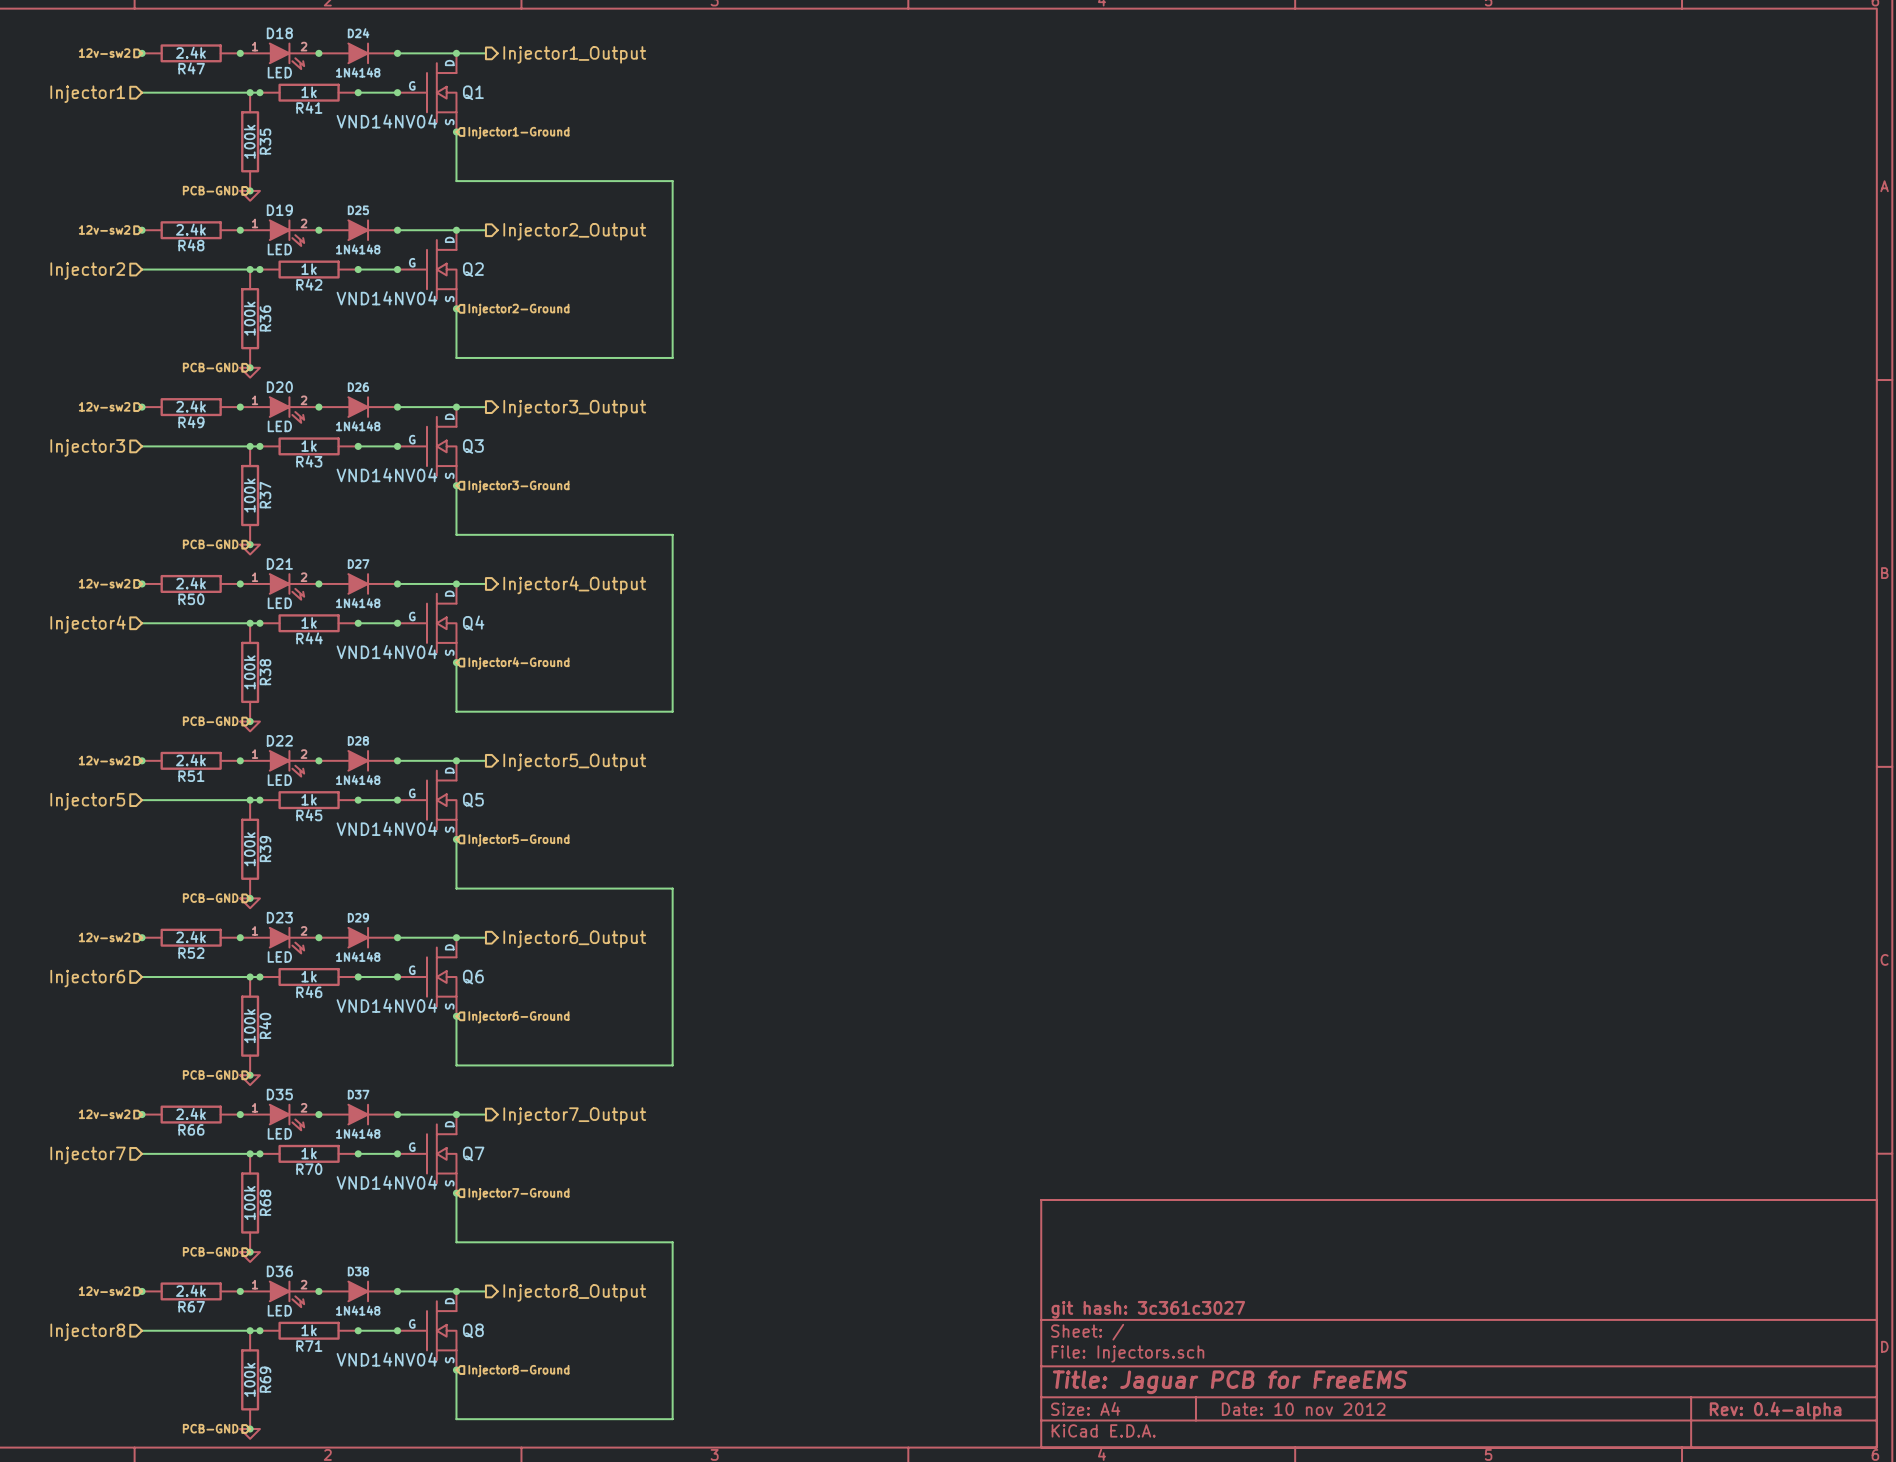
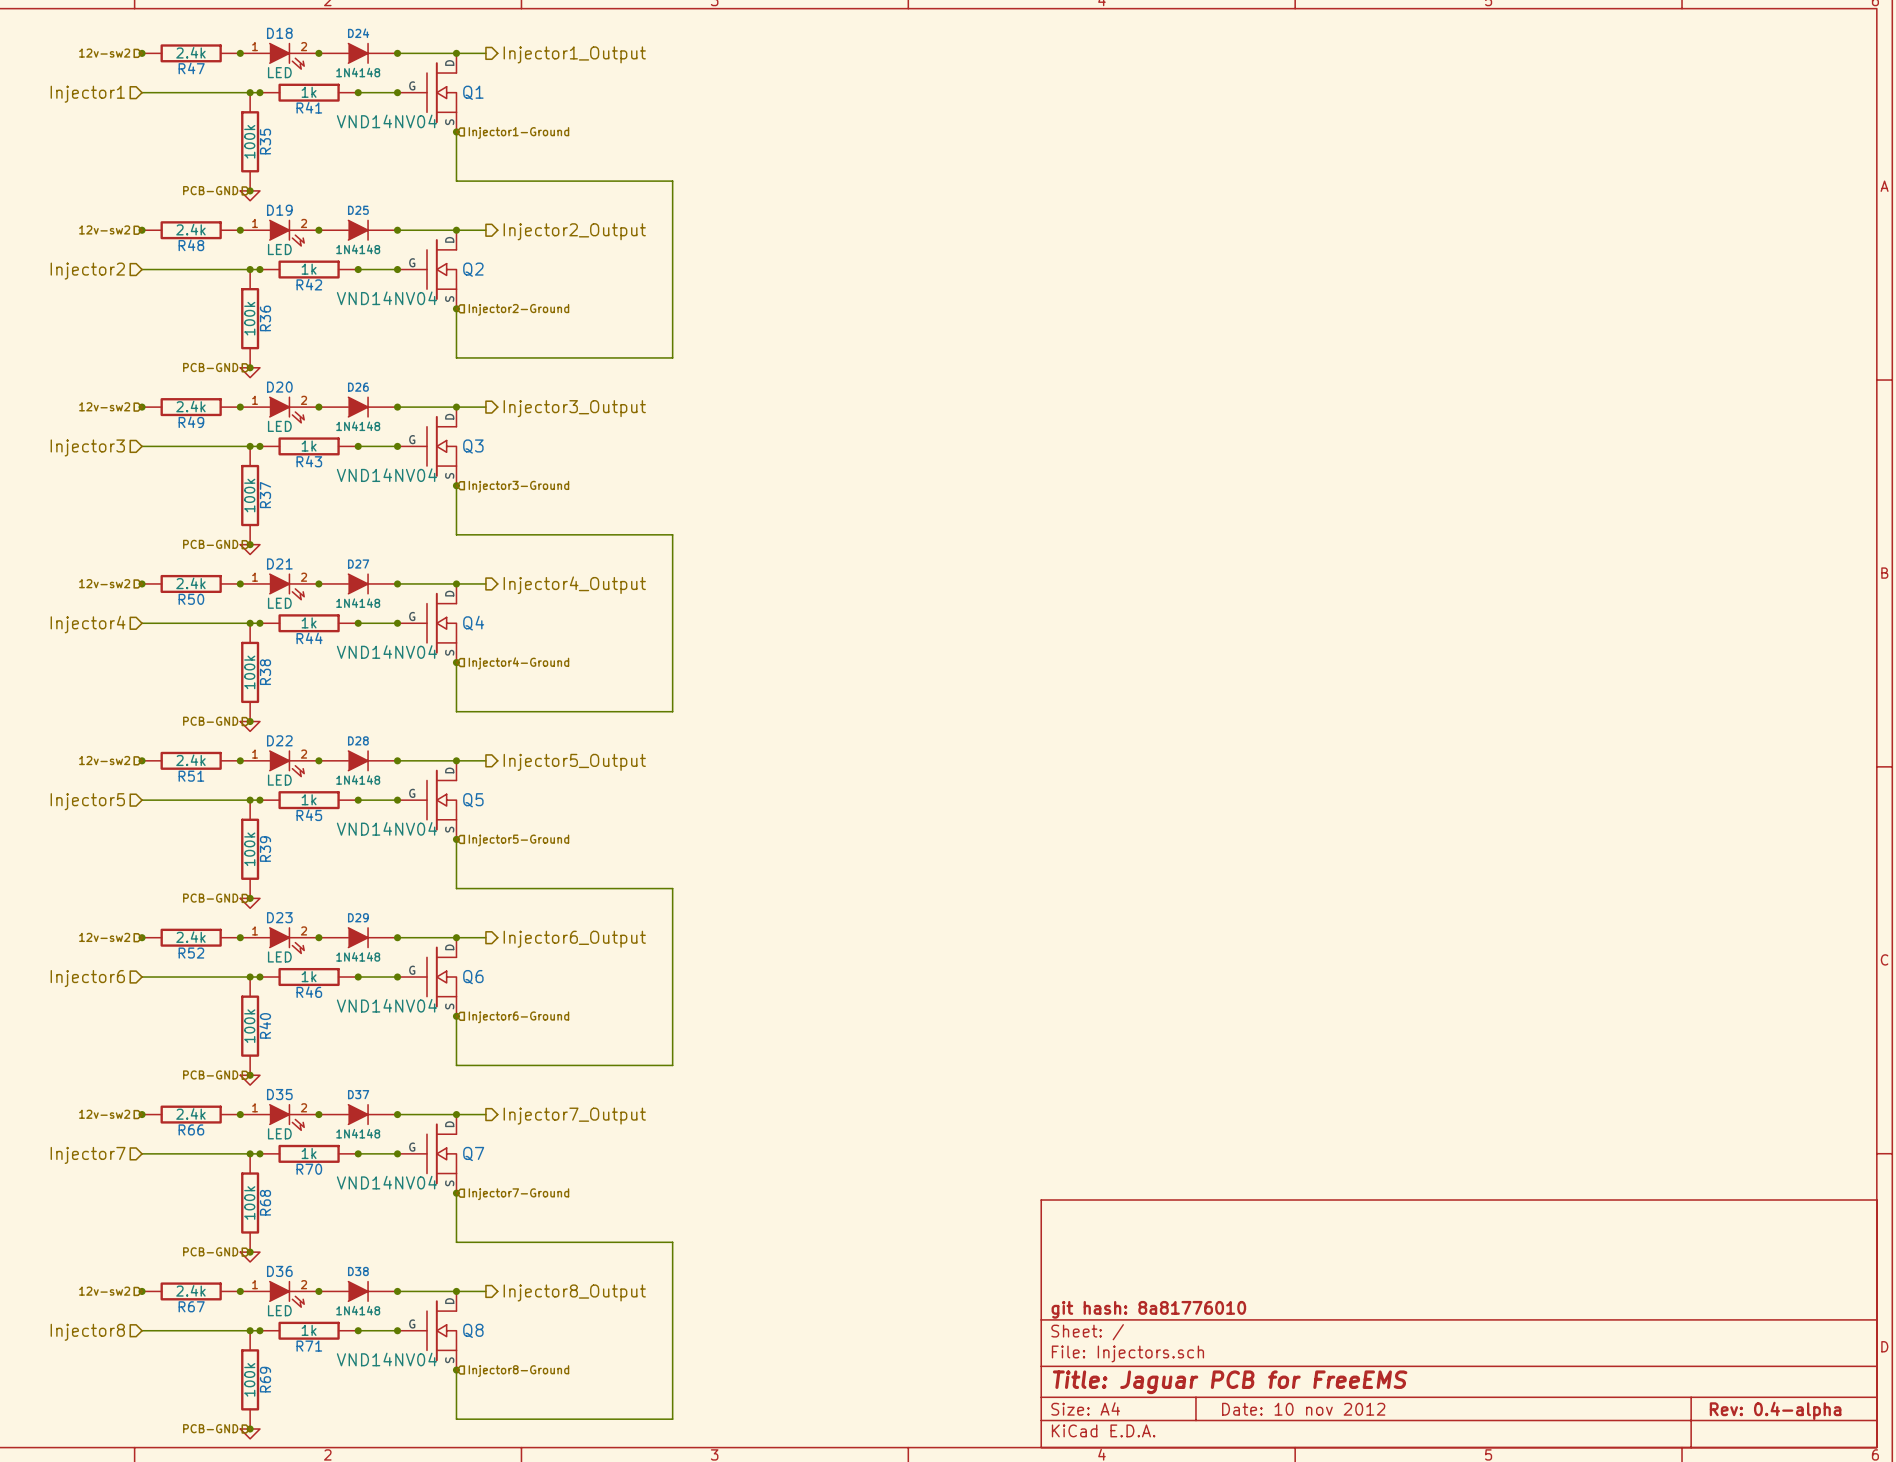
title block: git hash: 3c361c3027 (1148, 1309) -> git hash: 8a81776010 (1148, 1309)

